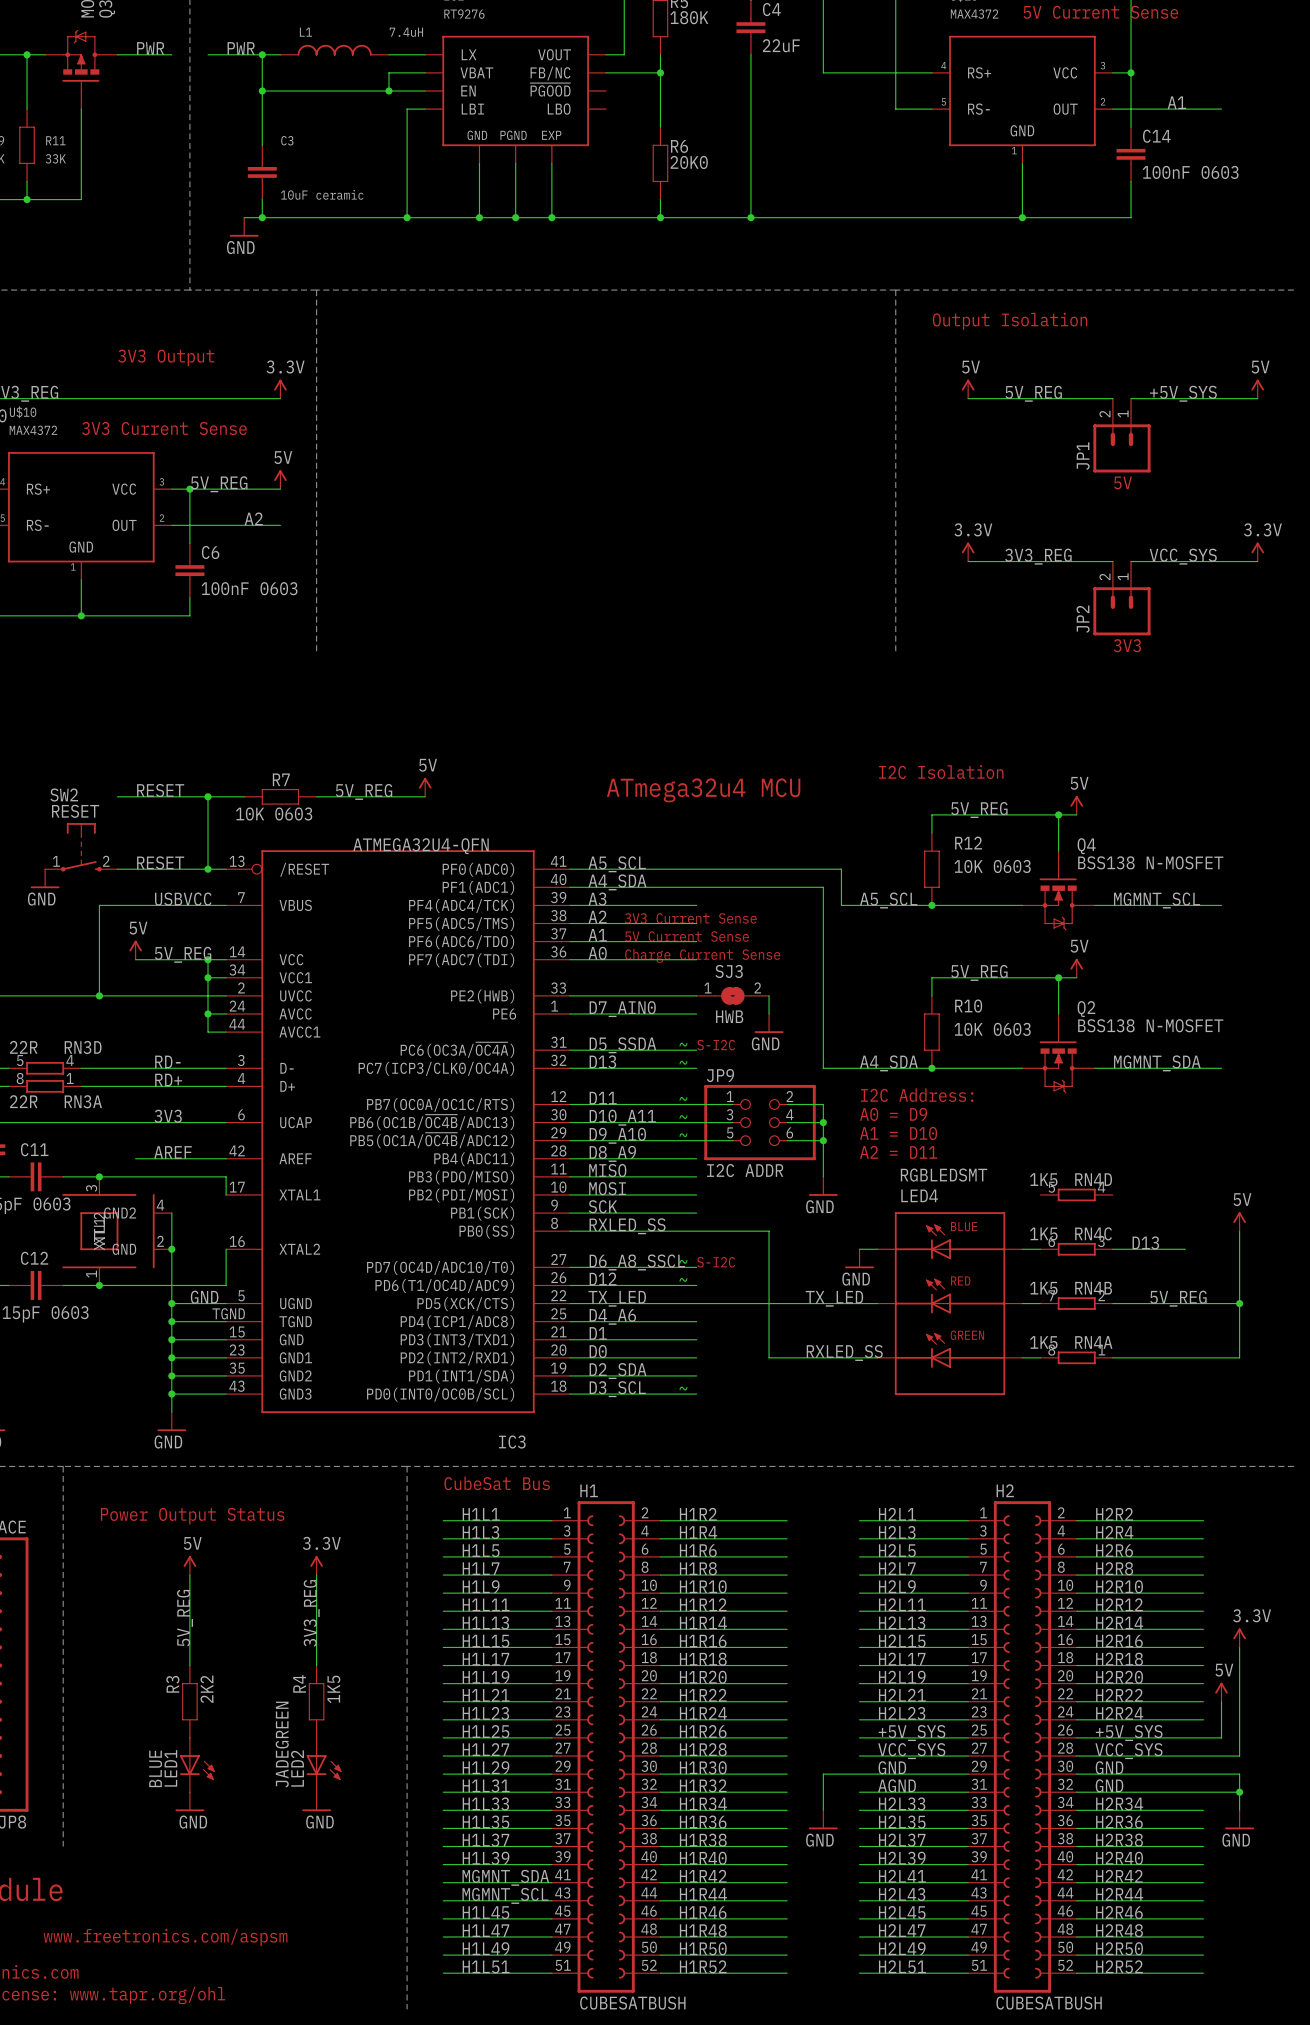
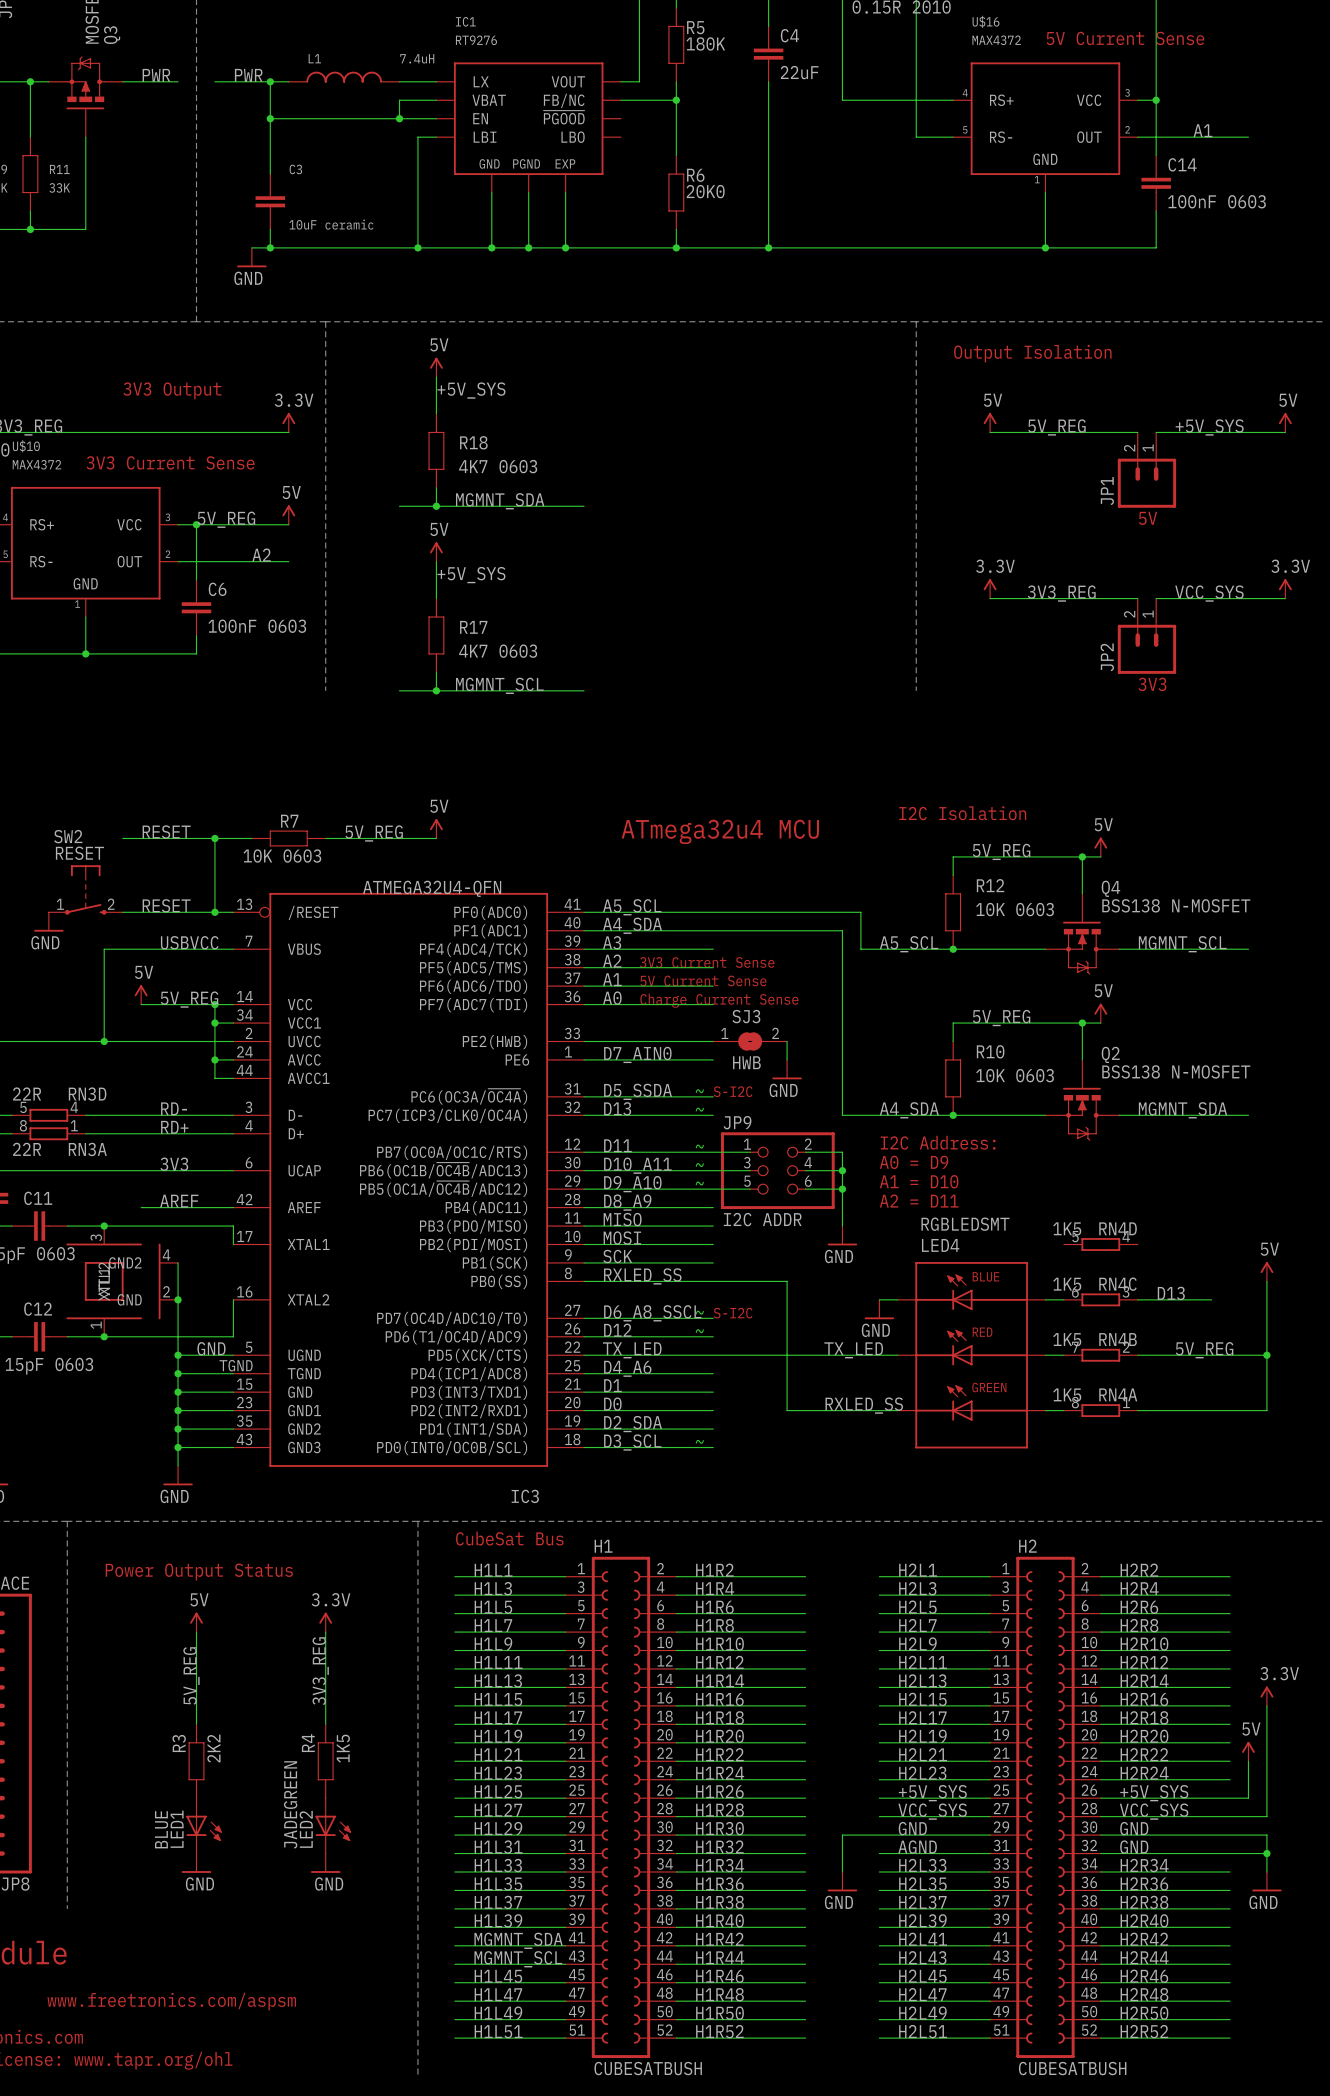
power symbol: none -> 5V (436, 367)
wire: none -> (436, 377) (436, 414)
label: none -> +5V_SYS (471, 390)
R18: none -> 4K7 0603 (436, 450)
wire: none -> (436, 487) (436, 506)
label: none -> MGMNT_SDA (500, 501)
wire: none -> (399, 506) (584, 506)
junction: none -> (436, 506)
power symbol: none -> 5V (436, 551)
wire: none -> (436, 561) (436, 598)
label: none -> +5V_SYS (471, 575)
R17: none -> 4K7 0603 (436, 635)
wire: none -> (436, 672) (436, 690)
label: none -> MGMNT_SCL (499, 685)
wire: none -> (399, 690) (584, 690)
junction: none -> (436, 690)

